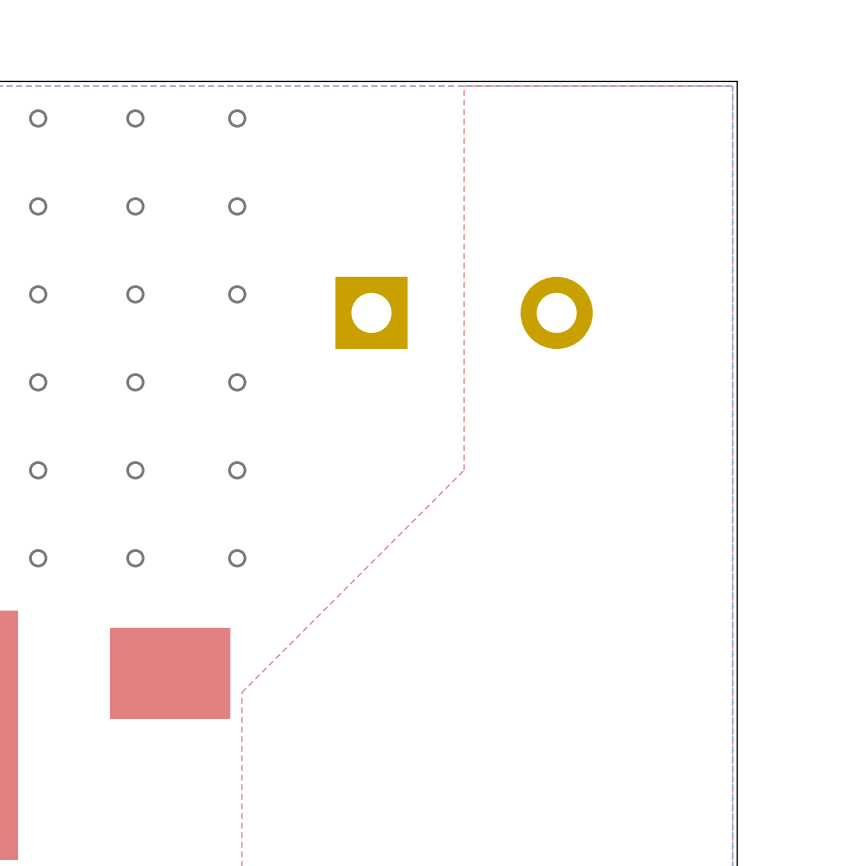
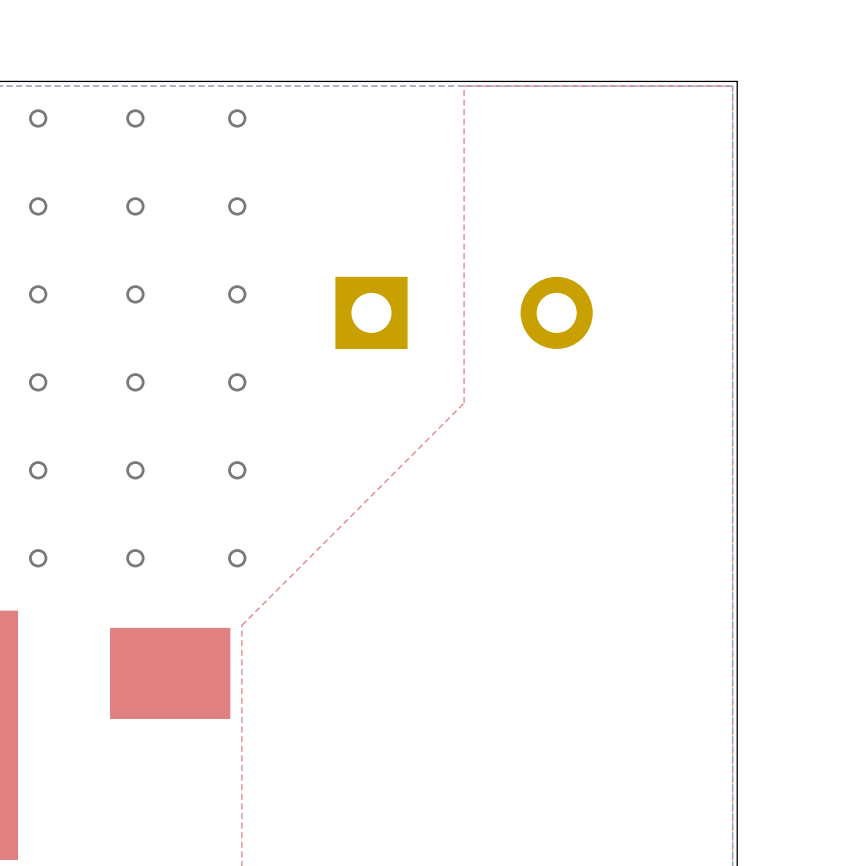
top zone outline: (464, 403) (464, 470) (241, 692) -> (464, 403) (241, 625) (241, 692)

